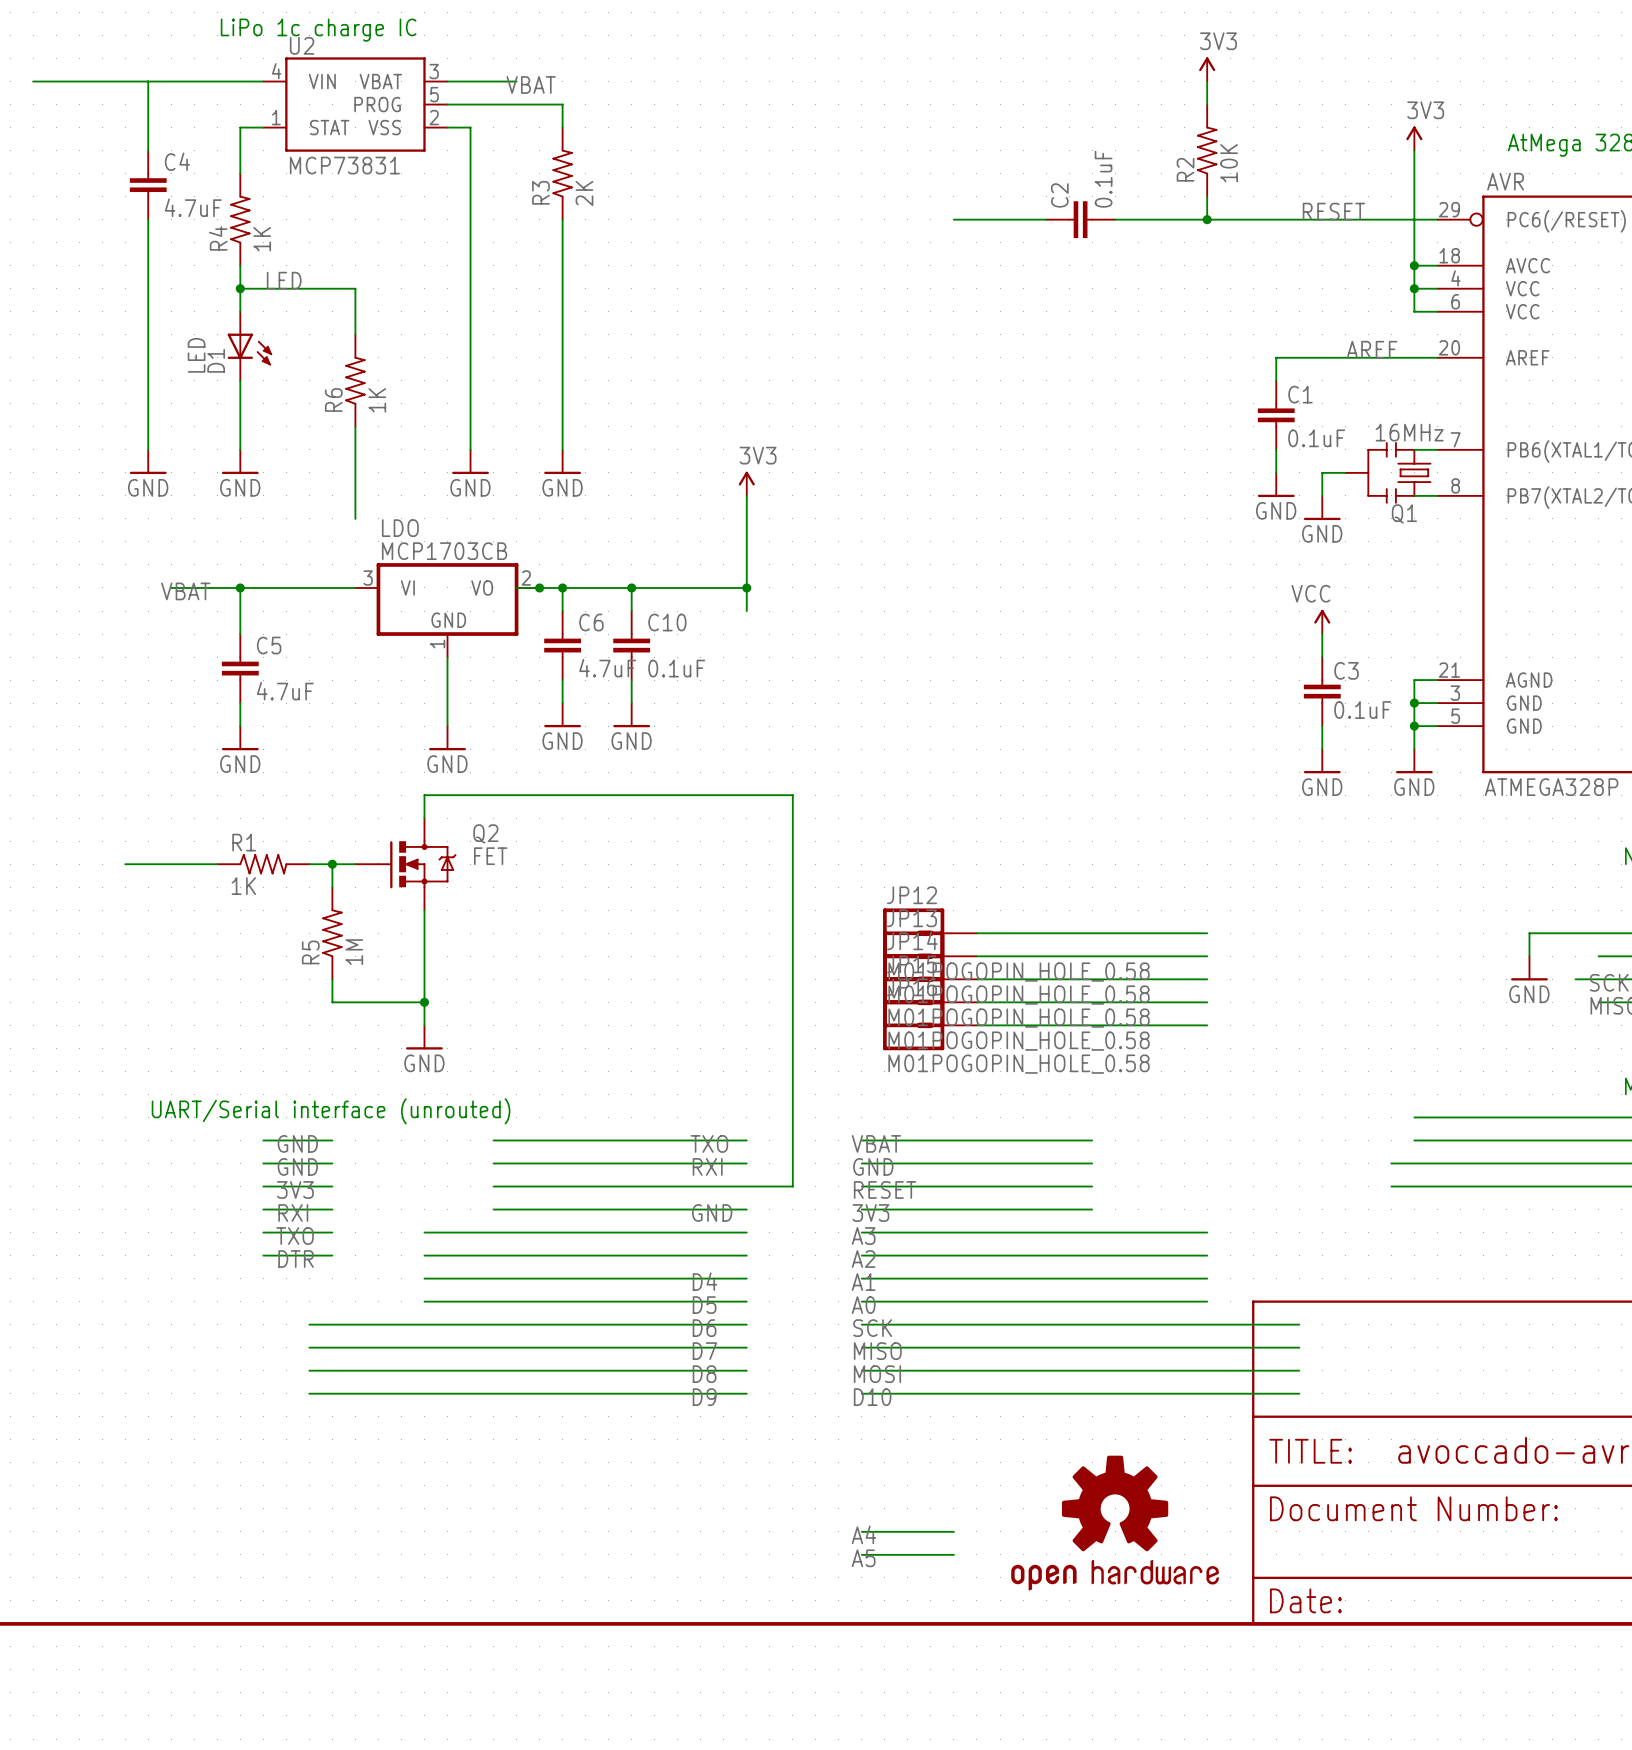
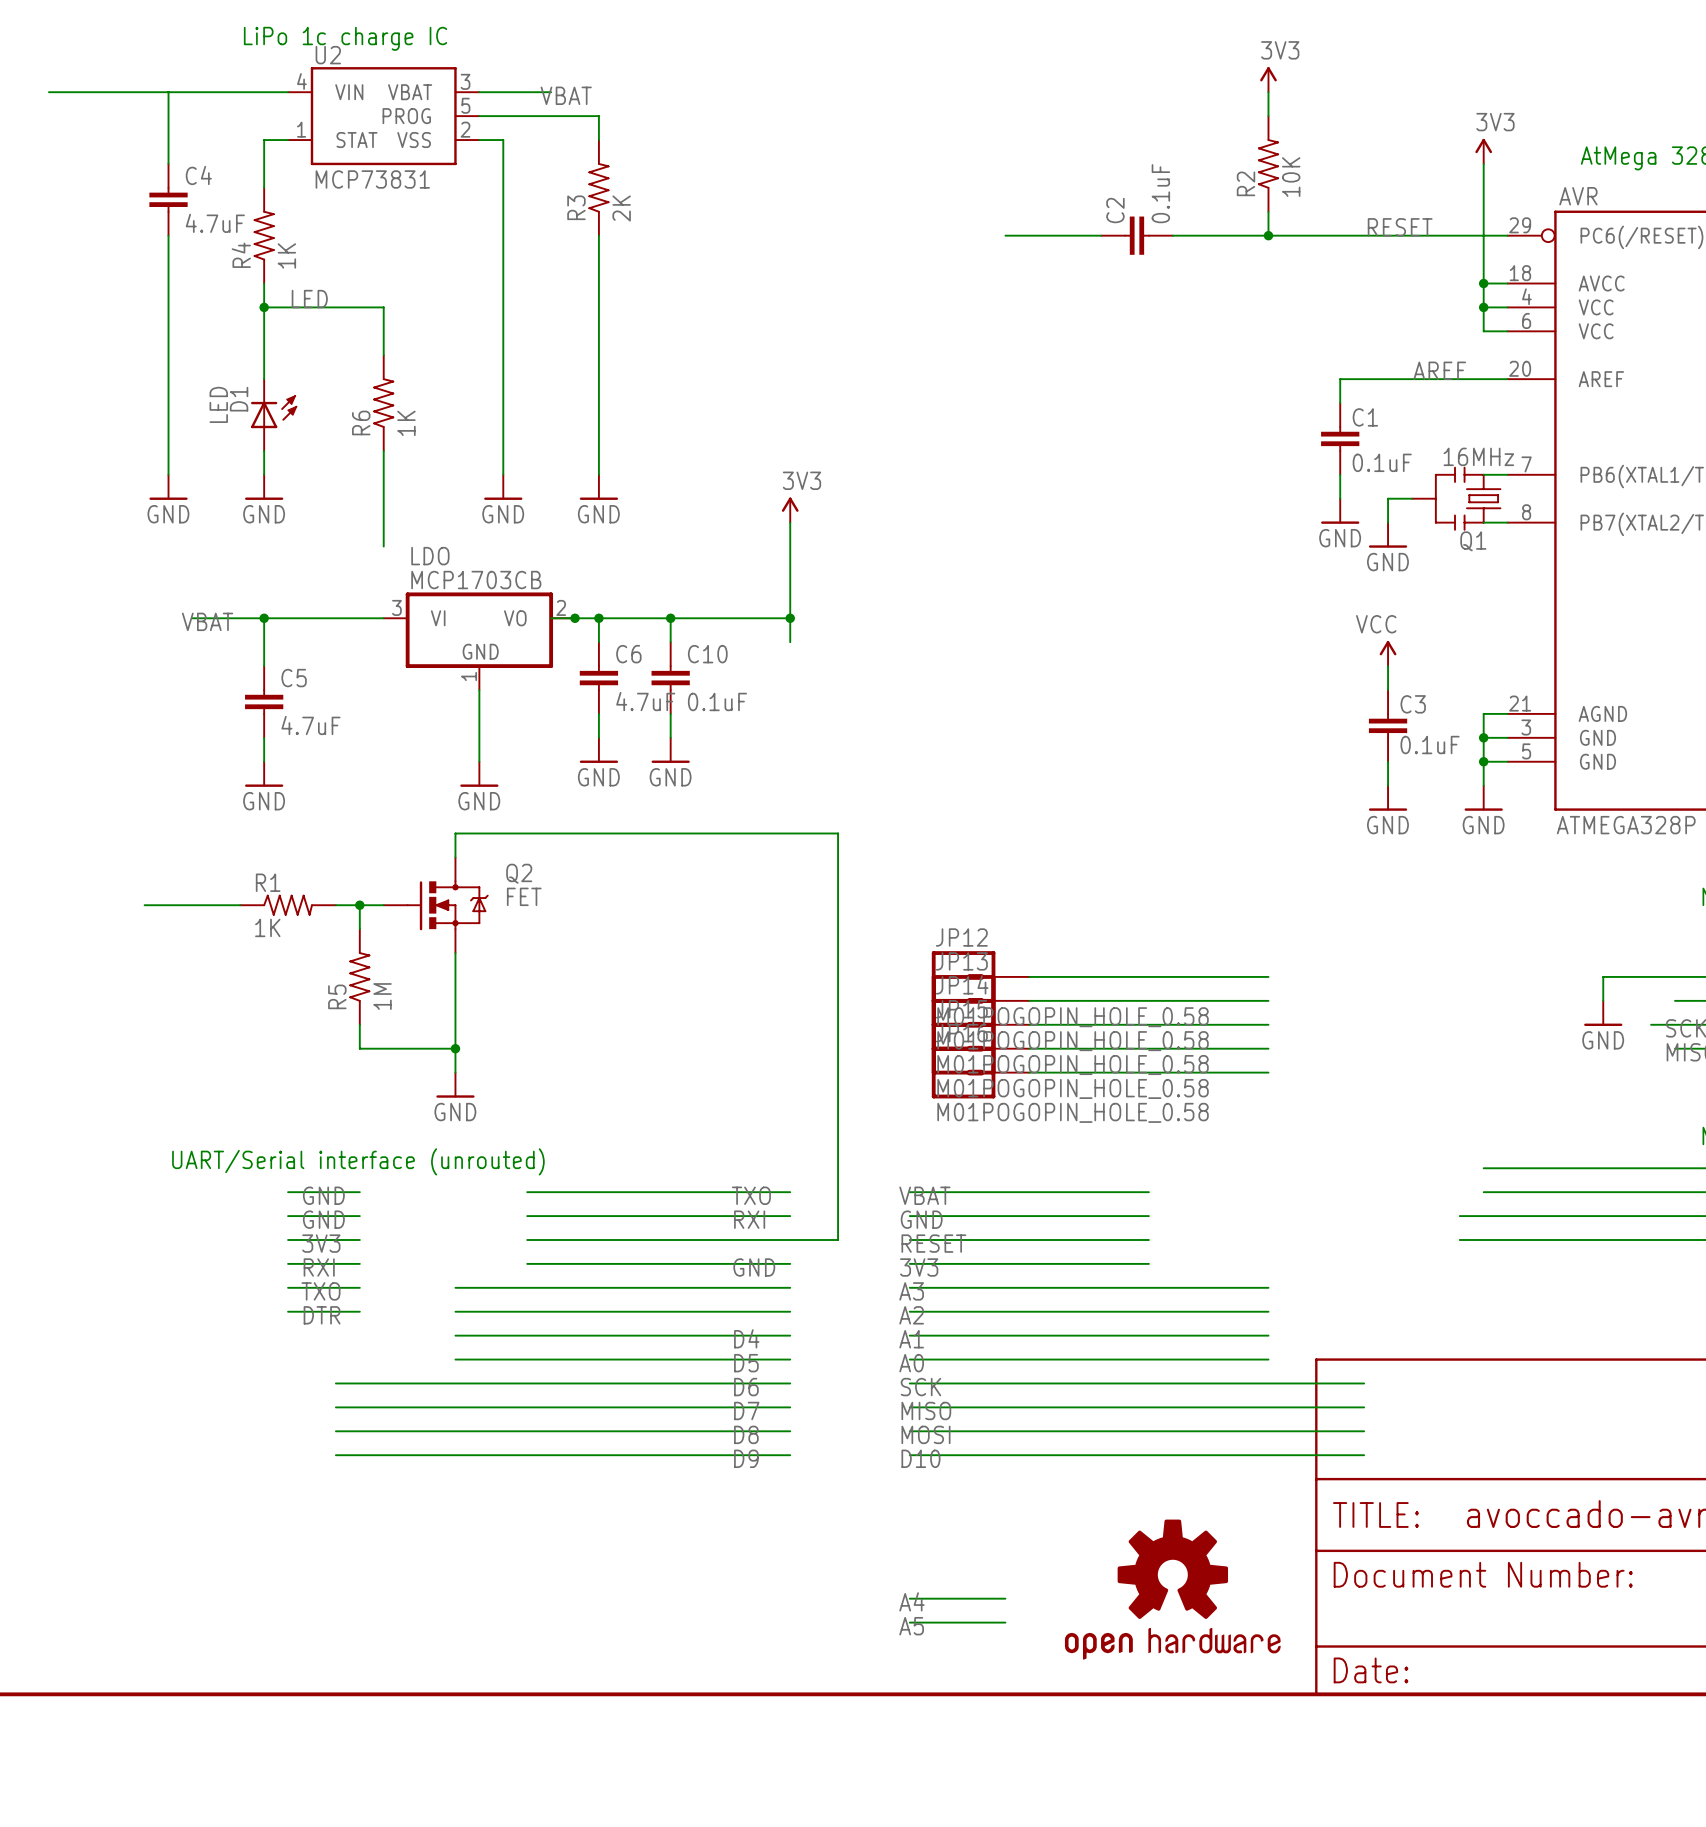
D1 position: (249, 346) -> (274, 415)
D1 flip: as is (249, 349) -> up-down (274, 411)

